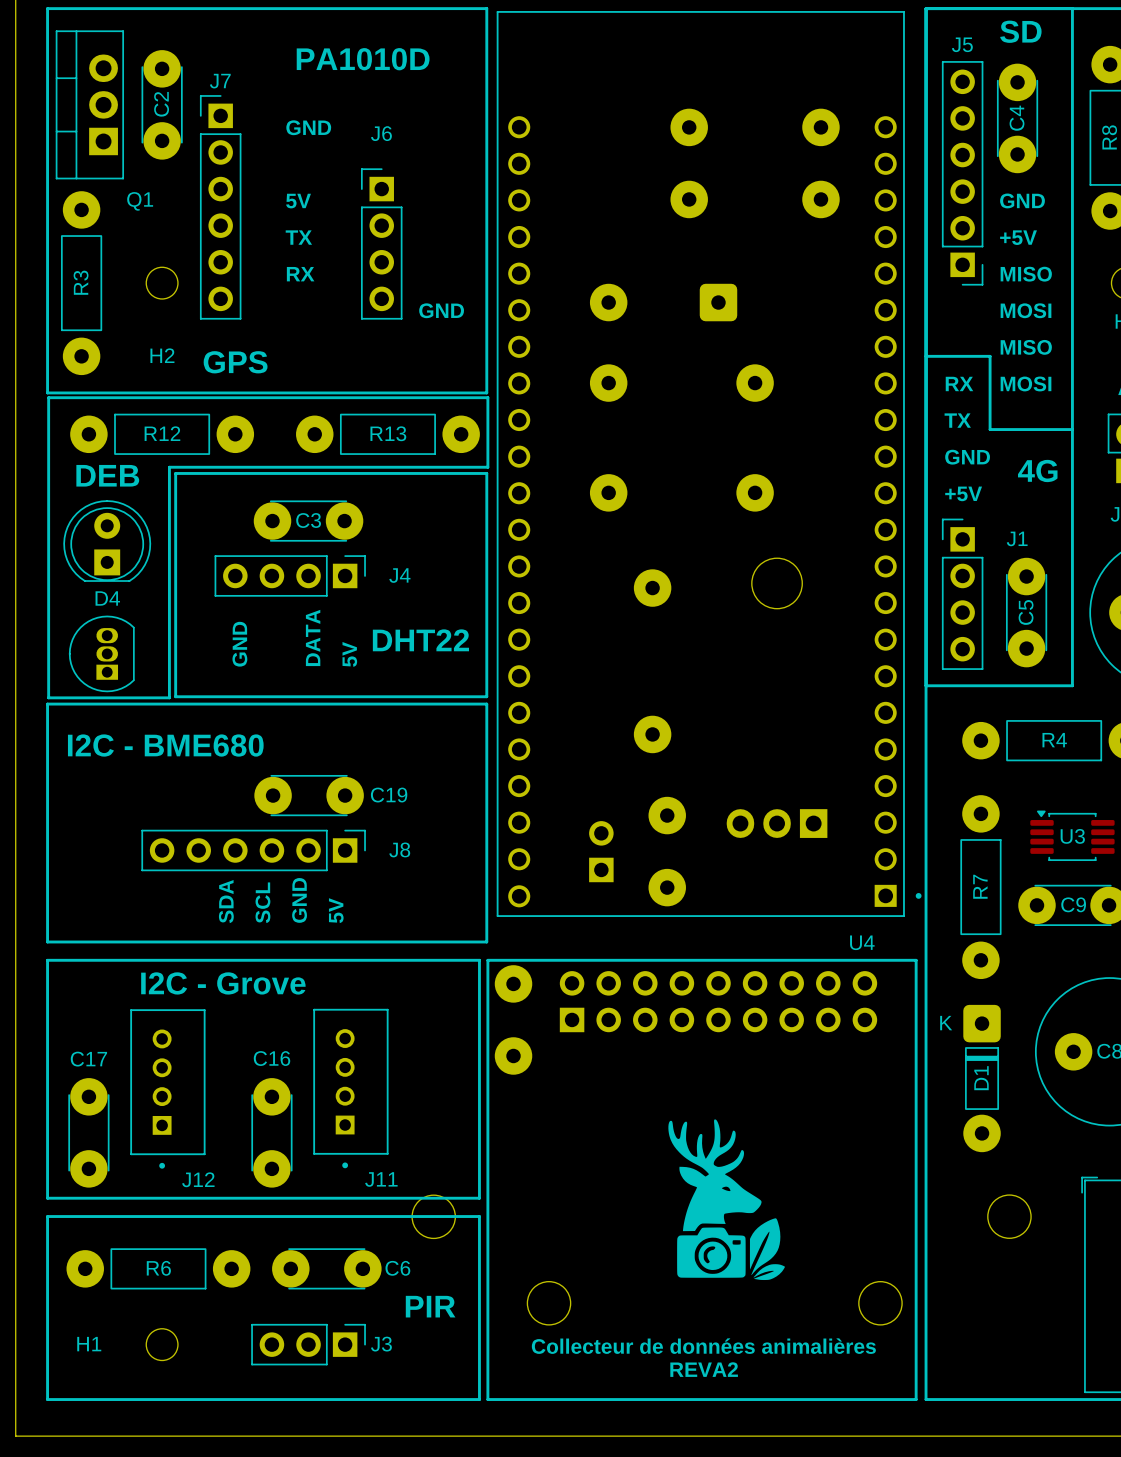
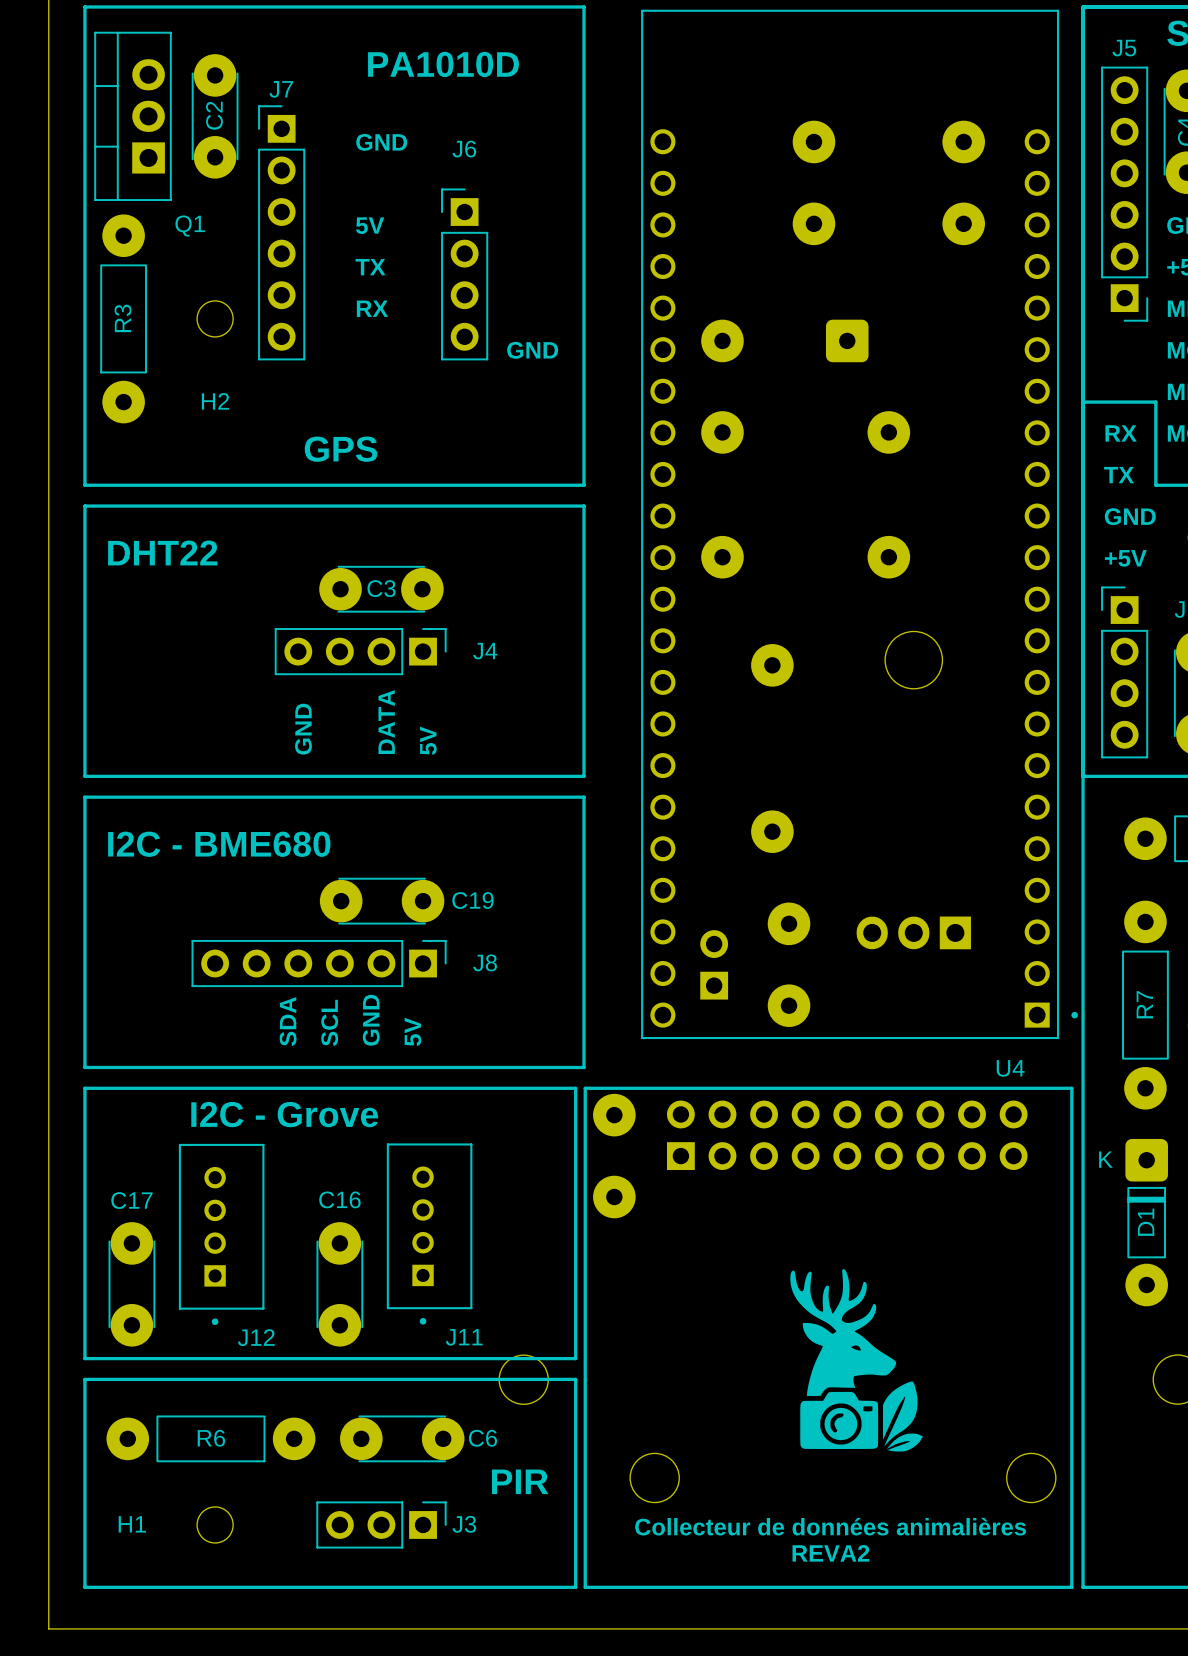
U4 footprint: [496, 11, 922, 917] -> [641, 9, 1078, 1040]
text position: GPS (235, 362) -> GPS (341, 449)
line: (47, 392) (486, 392) -> (84, 443) (84, 485) (583, 485) (583, 443)
line: (48, 397) (48, 697) (169, 697) (169, 467) (487, 467) (487, 397) (48, 397) -> none
R12: (162, 434) -> none
R13: (387, 434) -> none
line: (486, 473) (175, 473) (175, 696) (486, 696) (486, 685) -> (583, 535) (583, 506) (84, 506) (84, 776) (583, 776)
text: DEB (107, 475) -> none
D4: (107, 541) -> none
text position: DHT22 (420, 640) -> DHT22 (162, 552)
part: (101, 653) -> none

